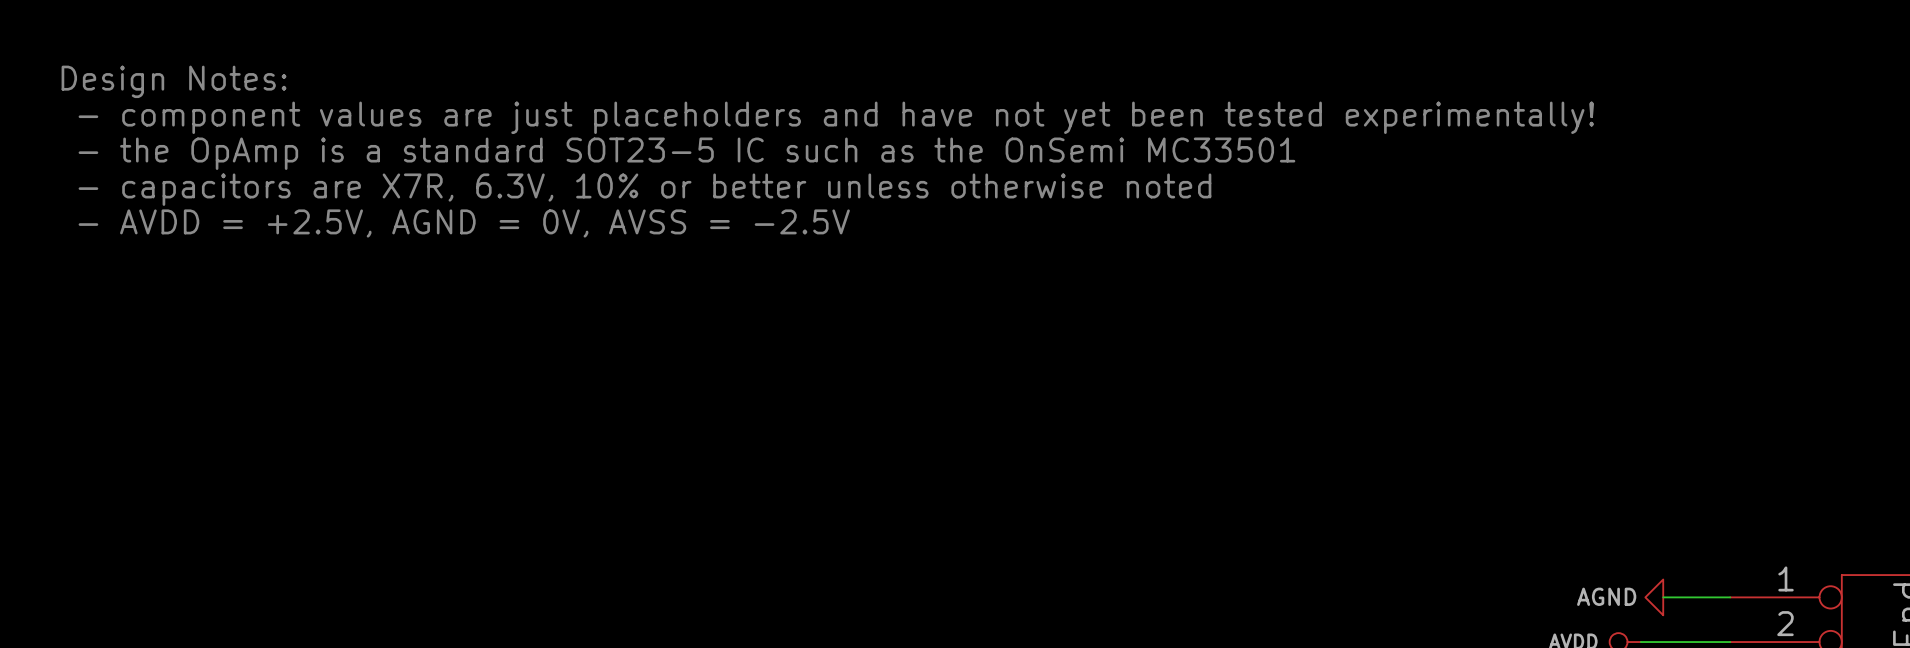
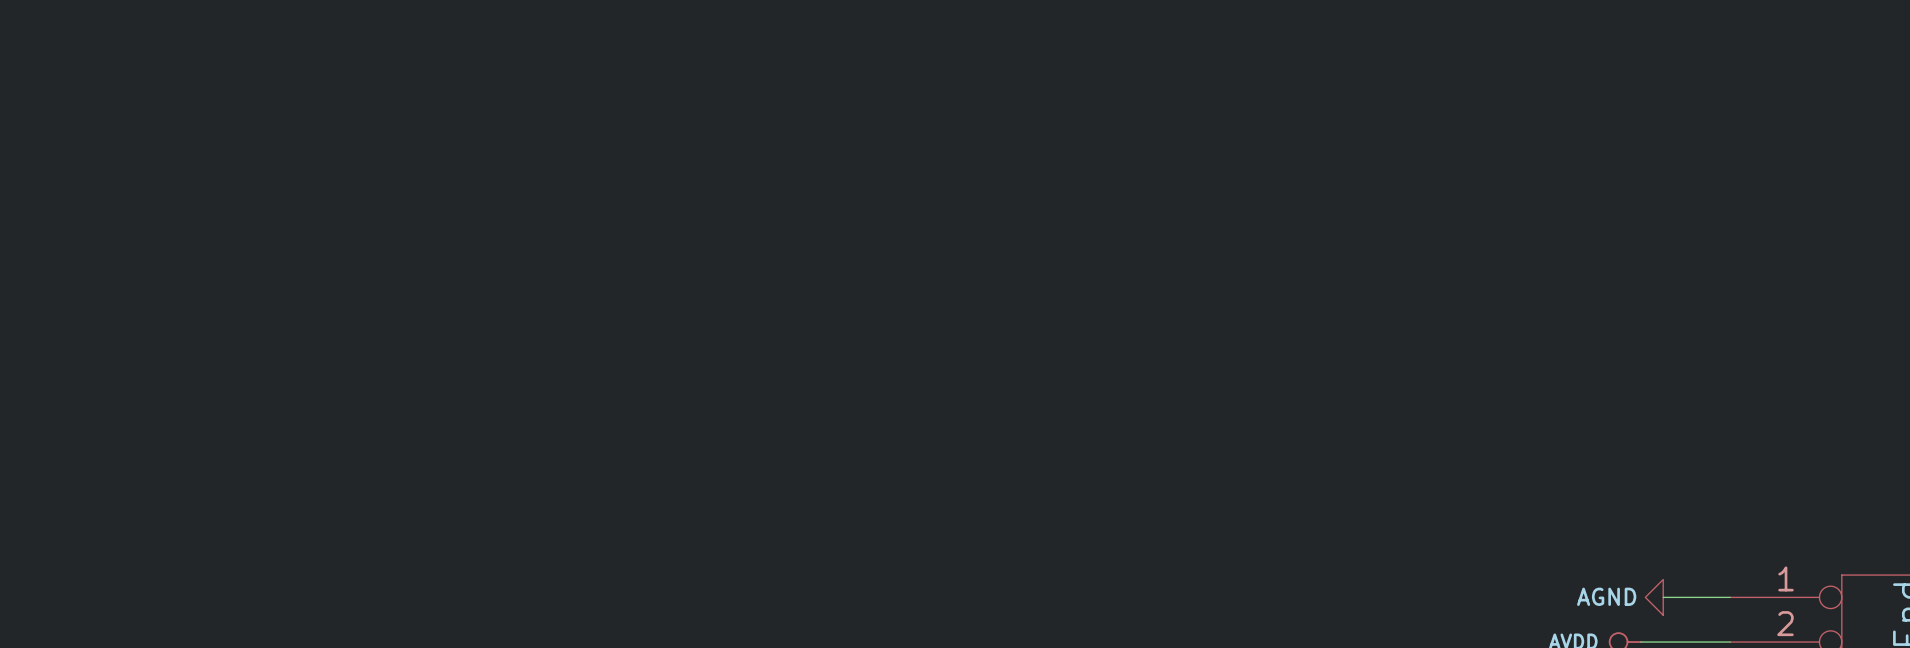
text: Design Notes: (174, 81) -> none
text: - component values are just placeholders and have not yet been tested experimentally! (836, 117) -> none
text: - the OpAmp is a standard SOT23-5 IC such as the OnSemi MC33501 (686, 153) -> none
text: - capacitors are X7R, 6.3V, 10% or better unless otherwise noted (644, 189) -> none
text: - AVDD = +2.5V, AGND = 0V, AVSS = -2.5V (464, 223) -> none

